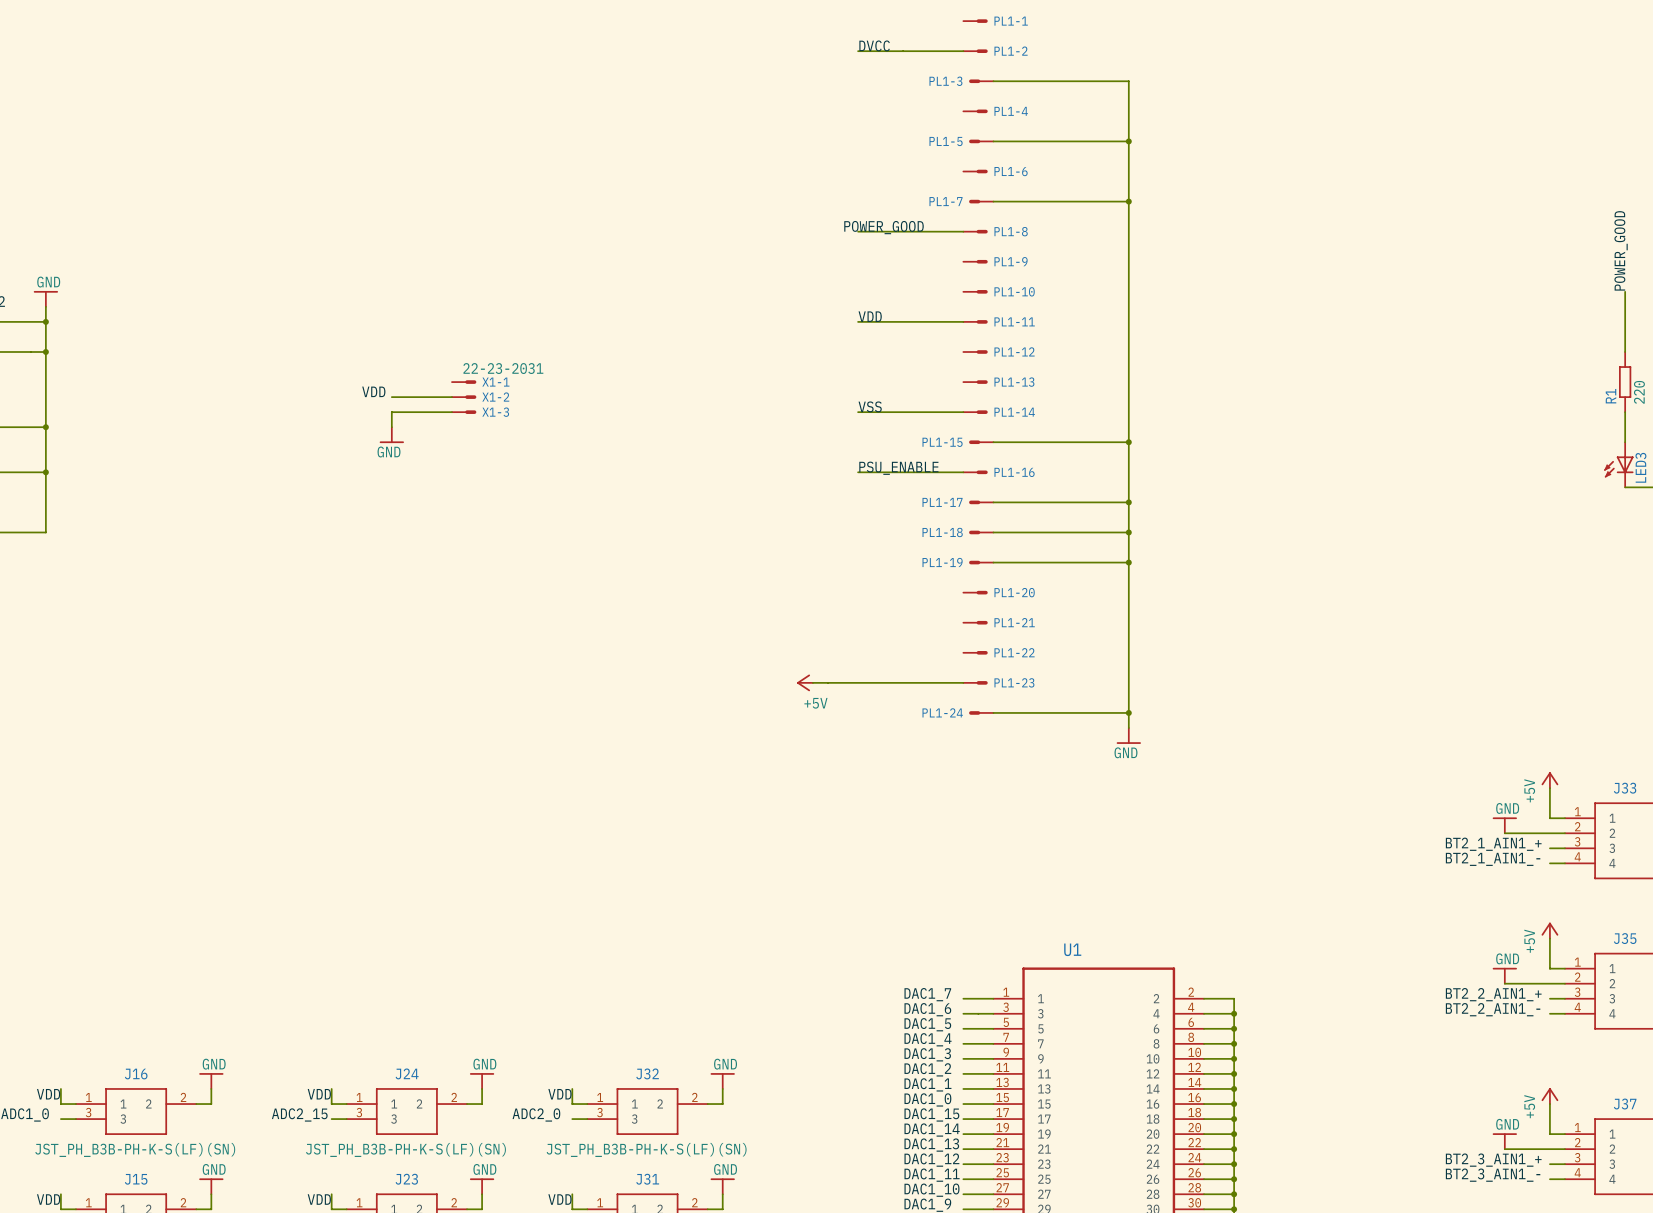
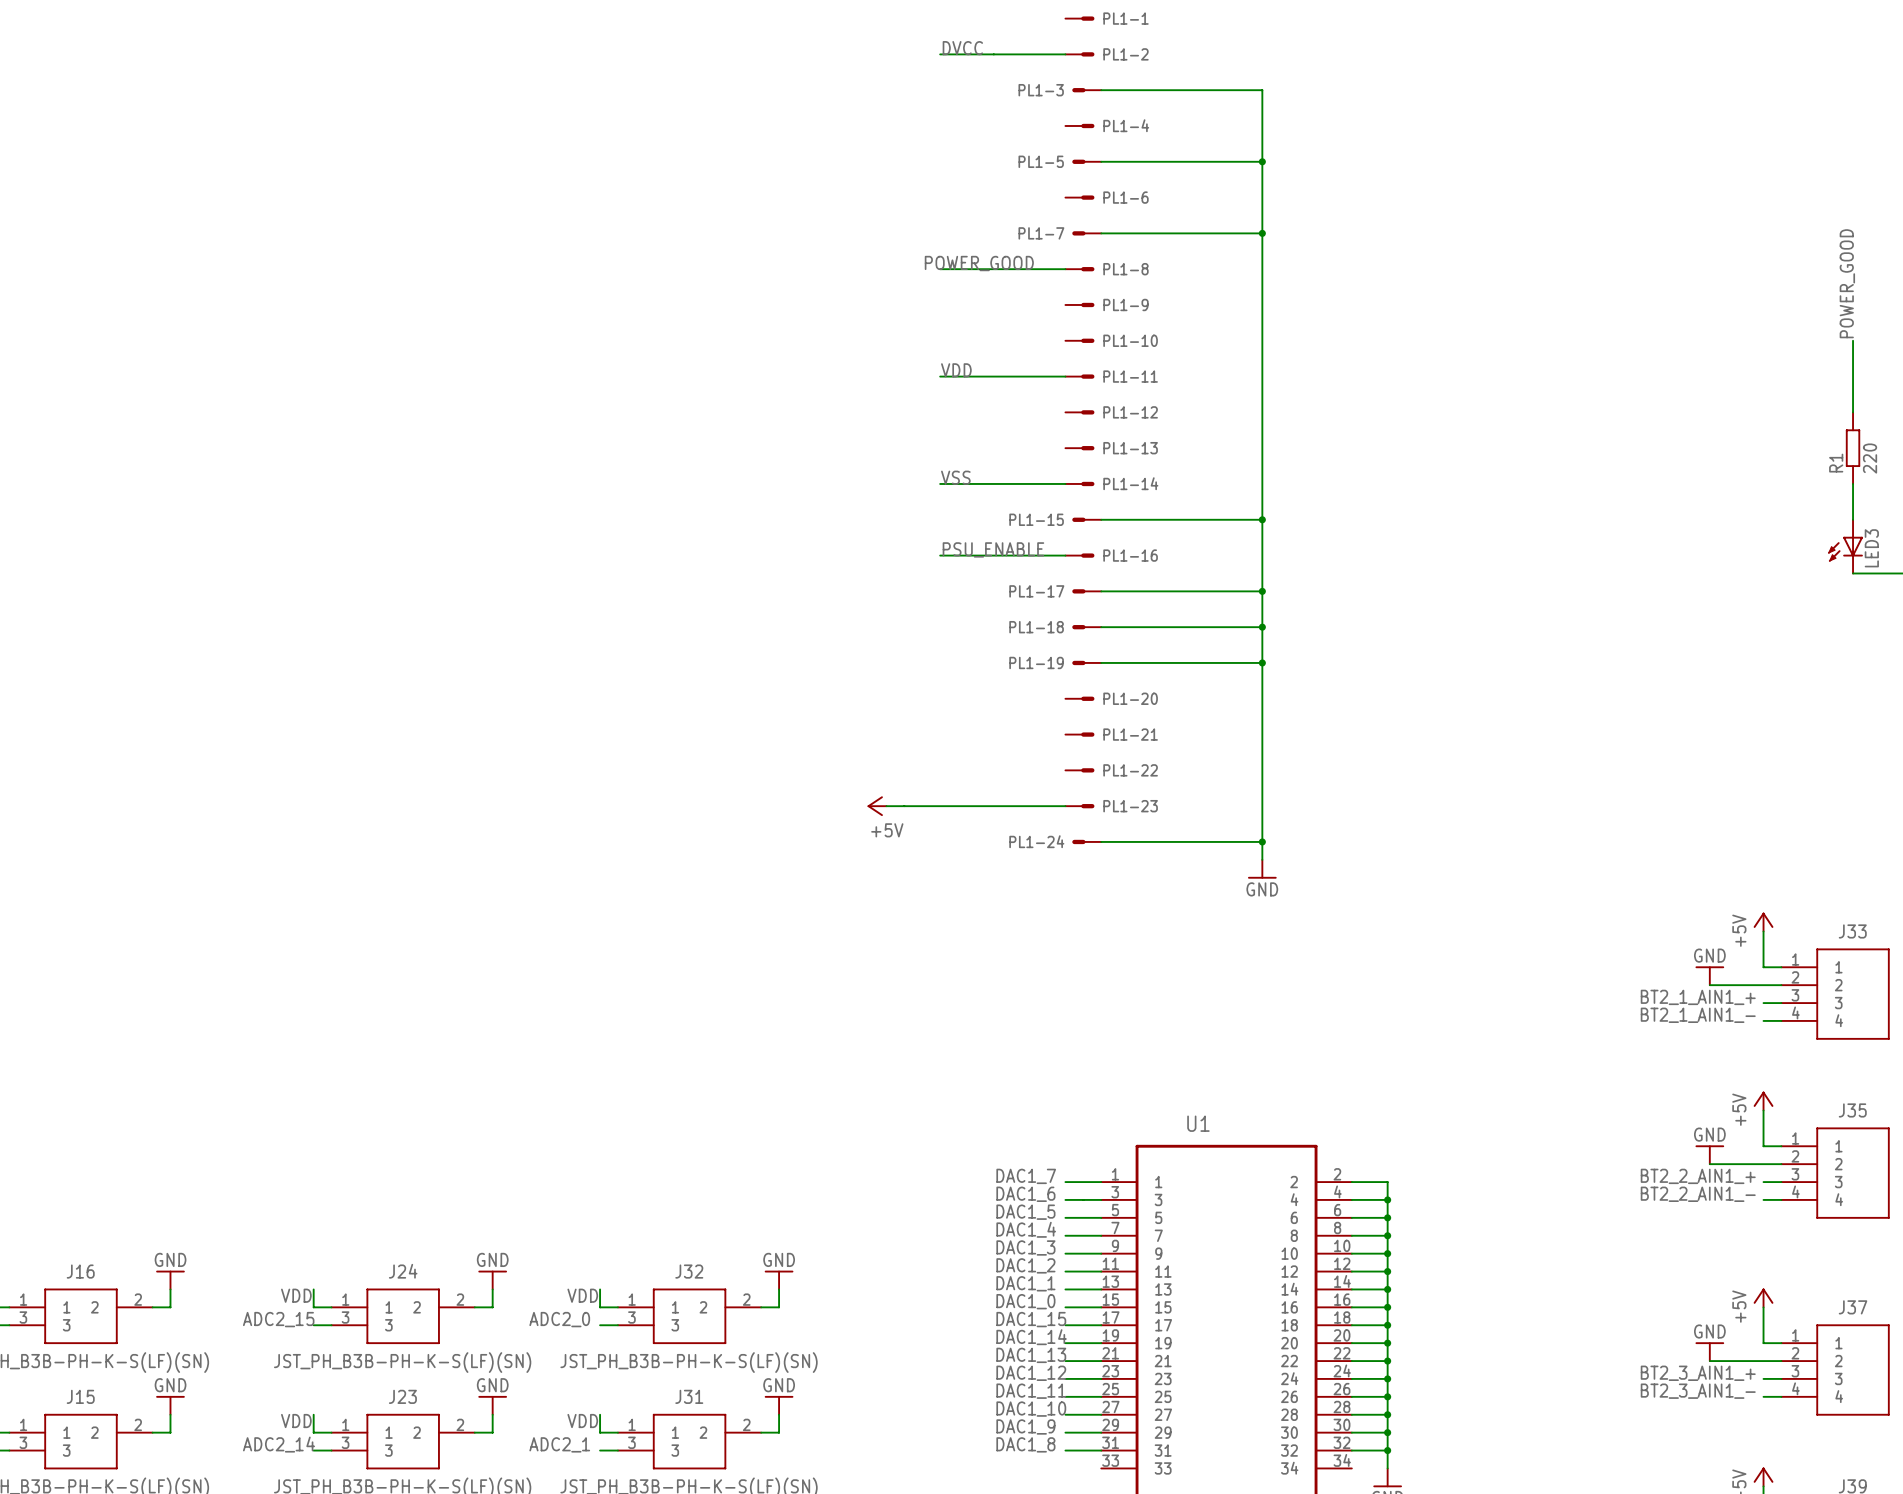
X1-1: 22-23-2031 (464, 382) -> none
label: VDD (373, 391) -> none
wire: (391, 397) (451, 397) -> none
X1-2: (464, 397) -> none
wire: (451, 412) (391, 412) (391, 427) -> none
X1-3: (464, 412) -> none
power symbol: GND (391, 435) -> none

